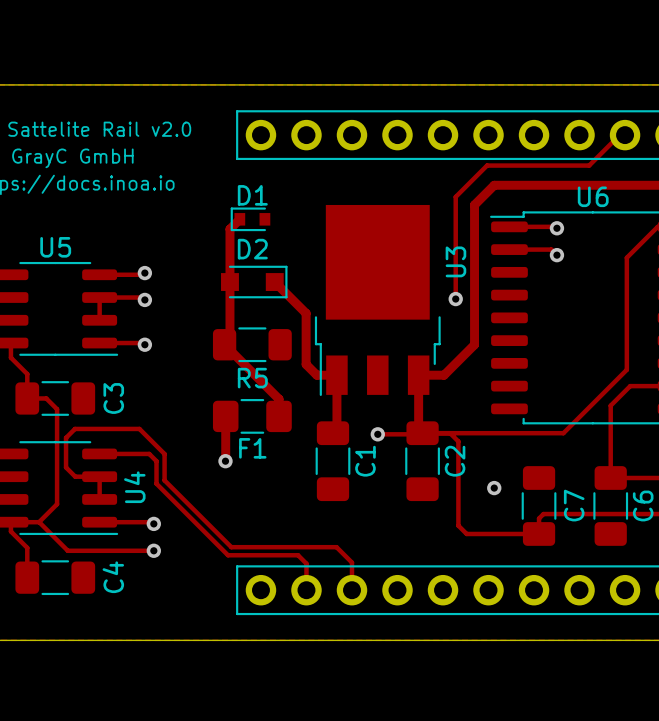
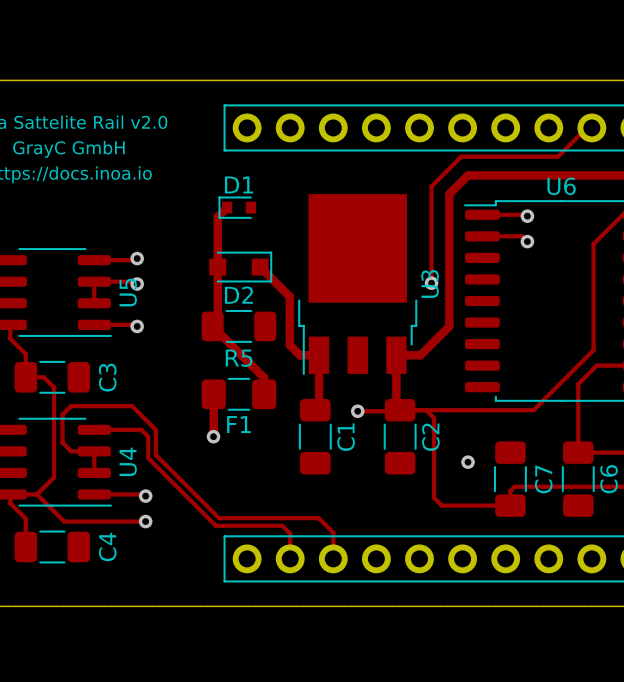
U5 name rotation: 0° (55, 247) -> 90° counterclockwise (128, 292)
U5 name position: U5 (55, 247) -> U5 (128, 292)
D2 name position: D2 (252, 249) -> D2 (238, 295)
U3 name position: U3 (455, 261) -> U3 (430, 283)

